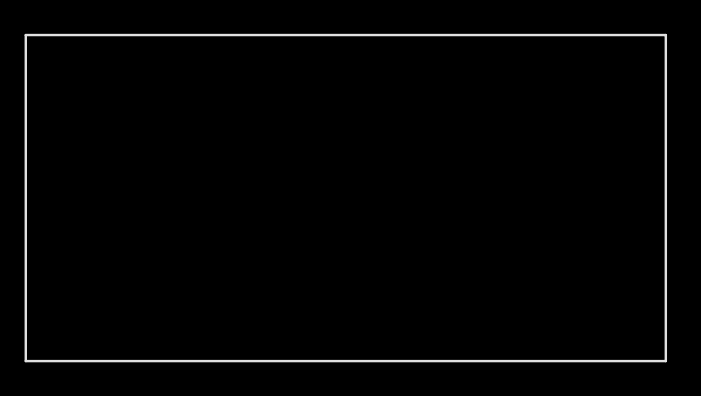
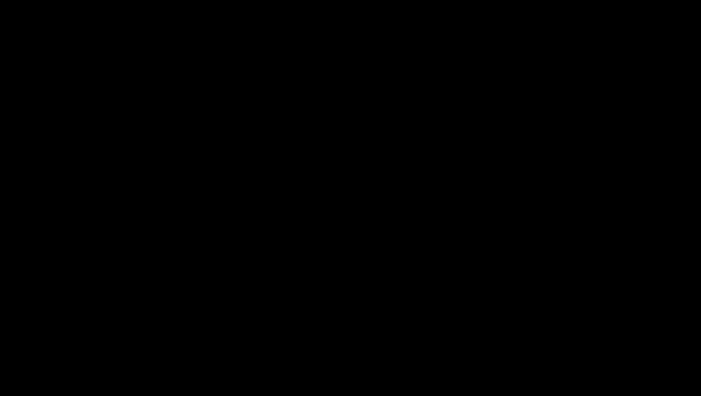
line: (25, 35) (25, 361) (665, 361) (665, 35) (25, 35) -> none

